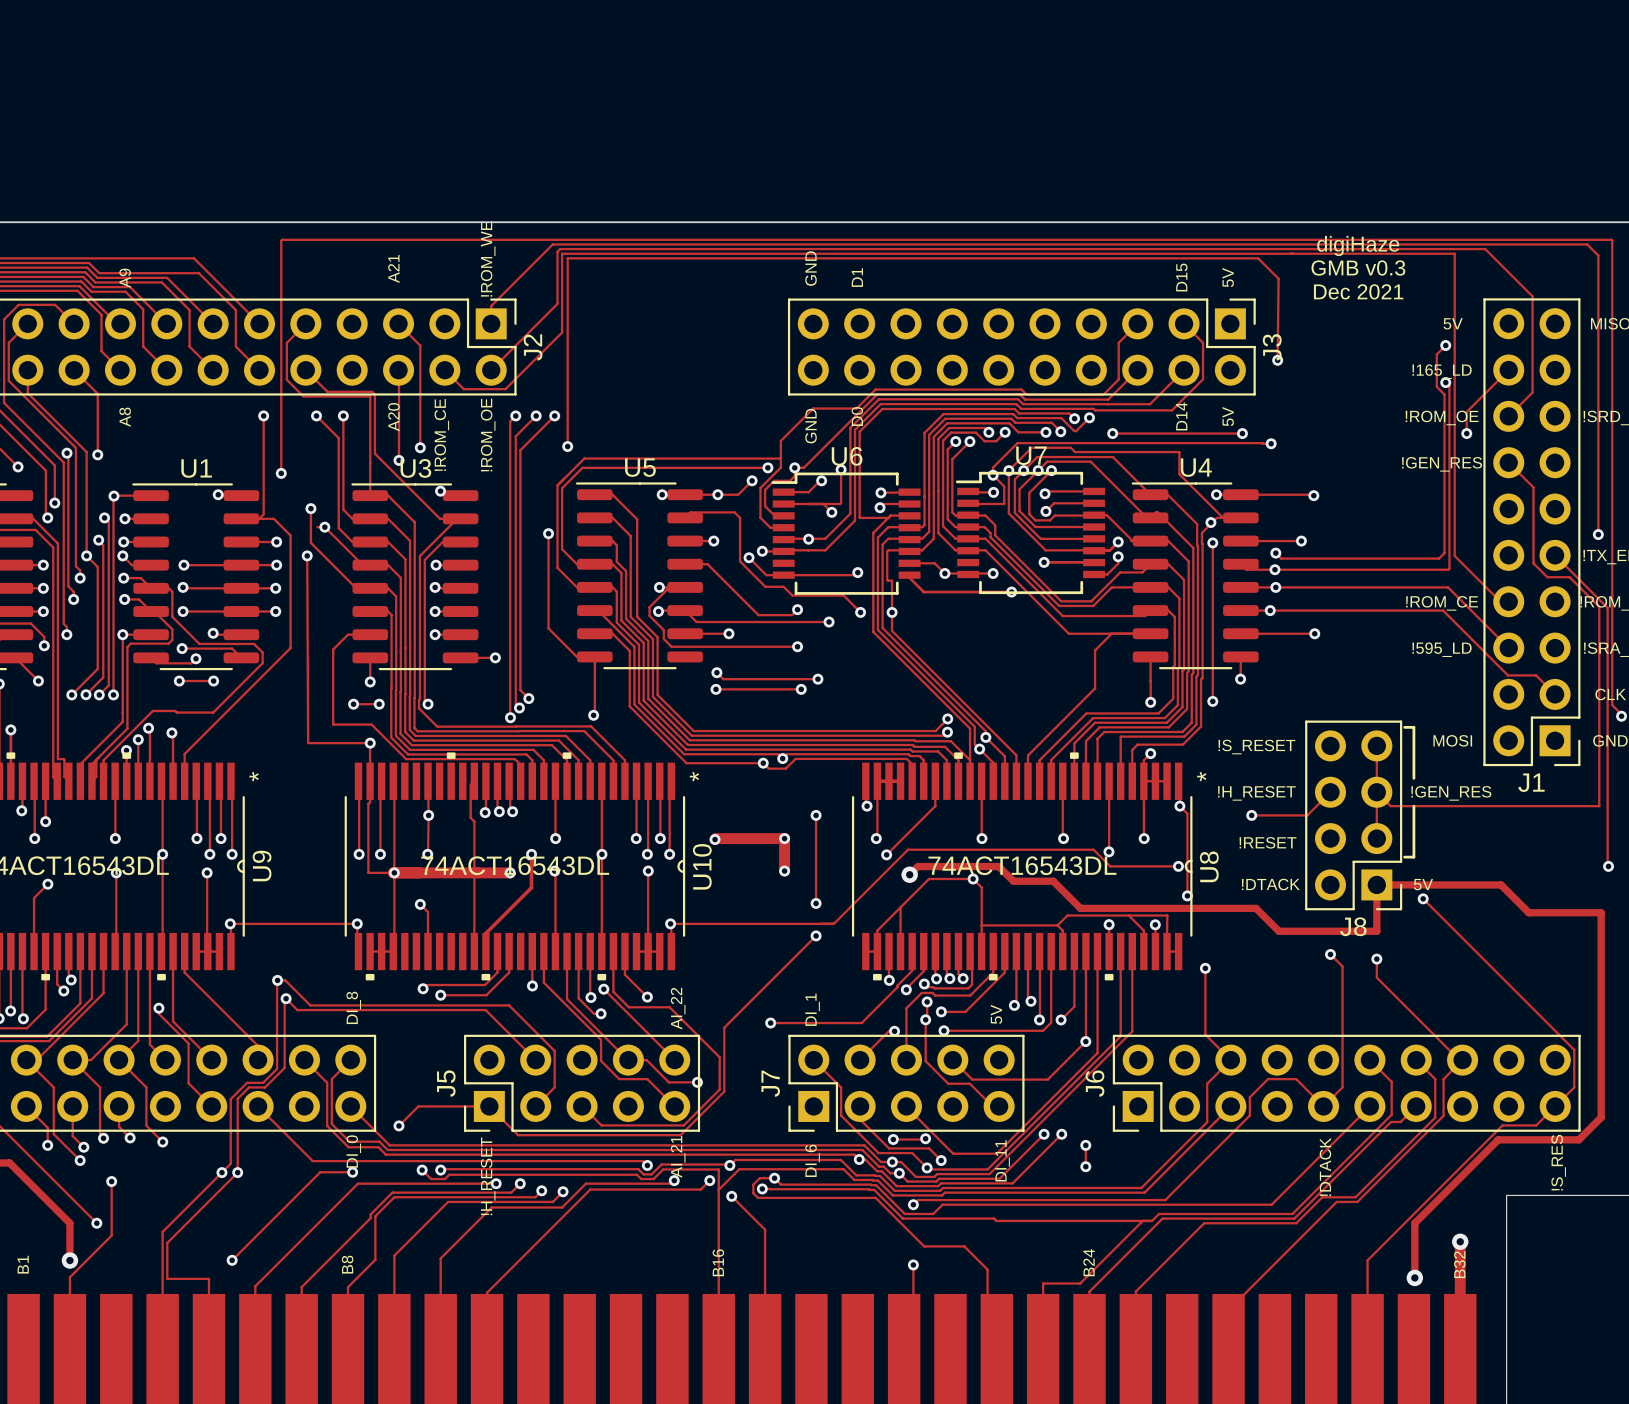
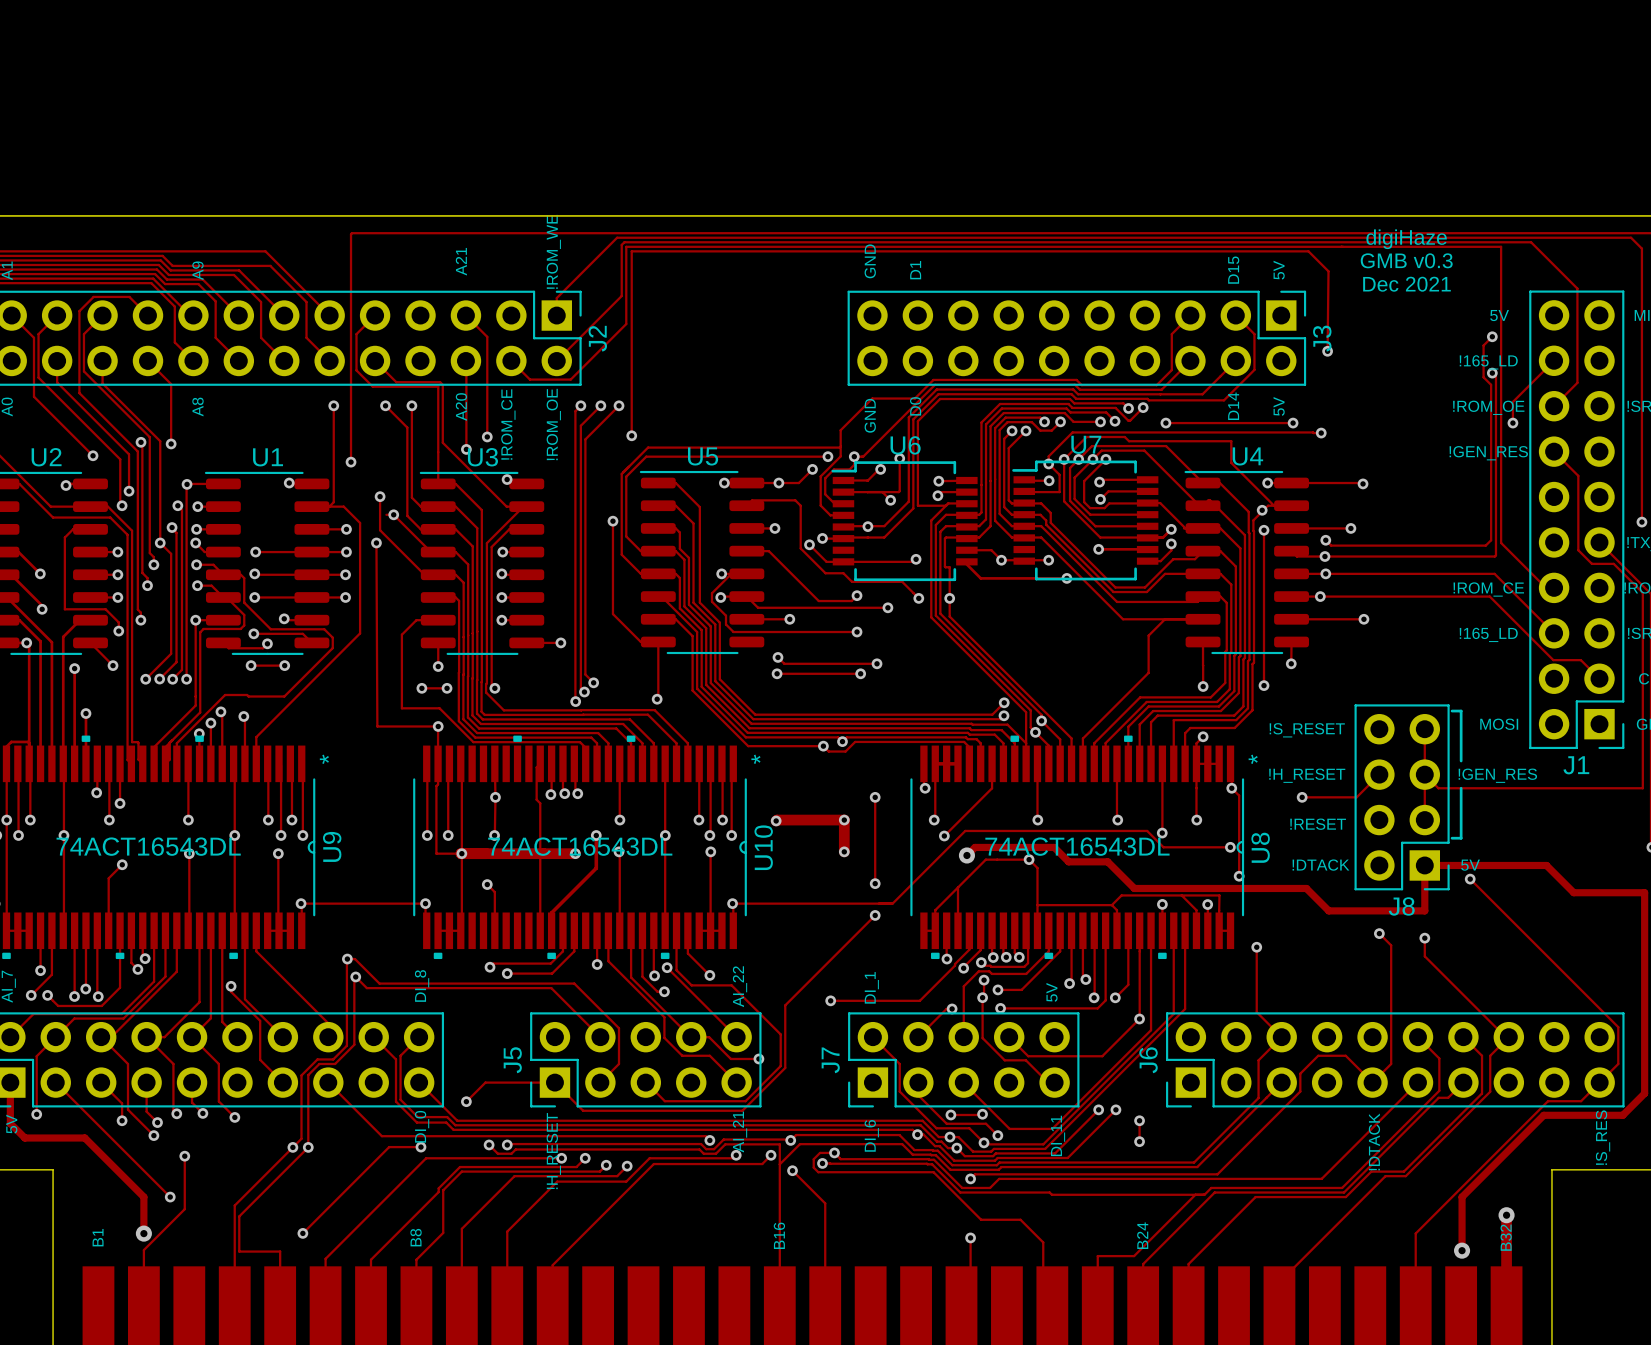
text: !595_LD (1442, 649) -> !165_LD (1488, 634)

